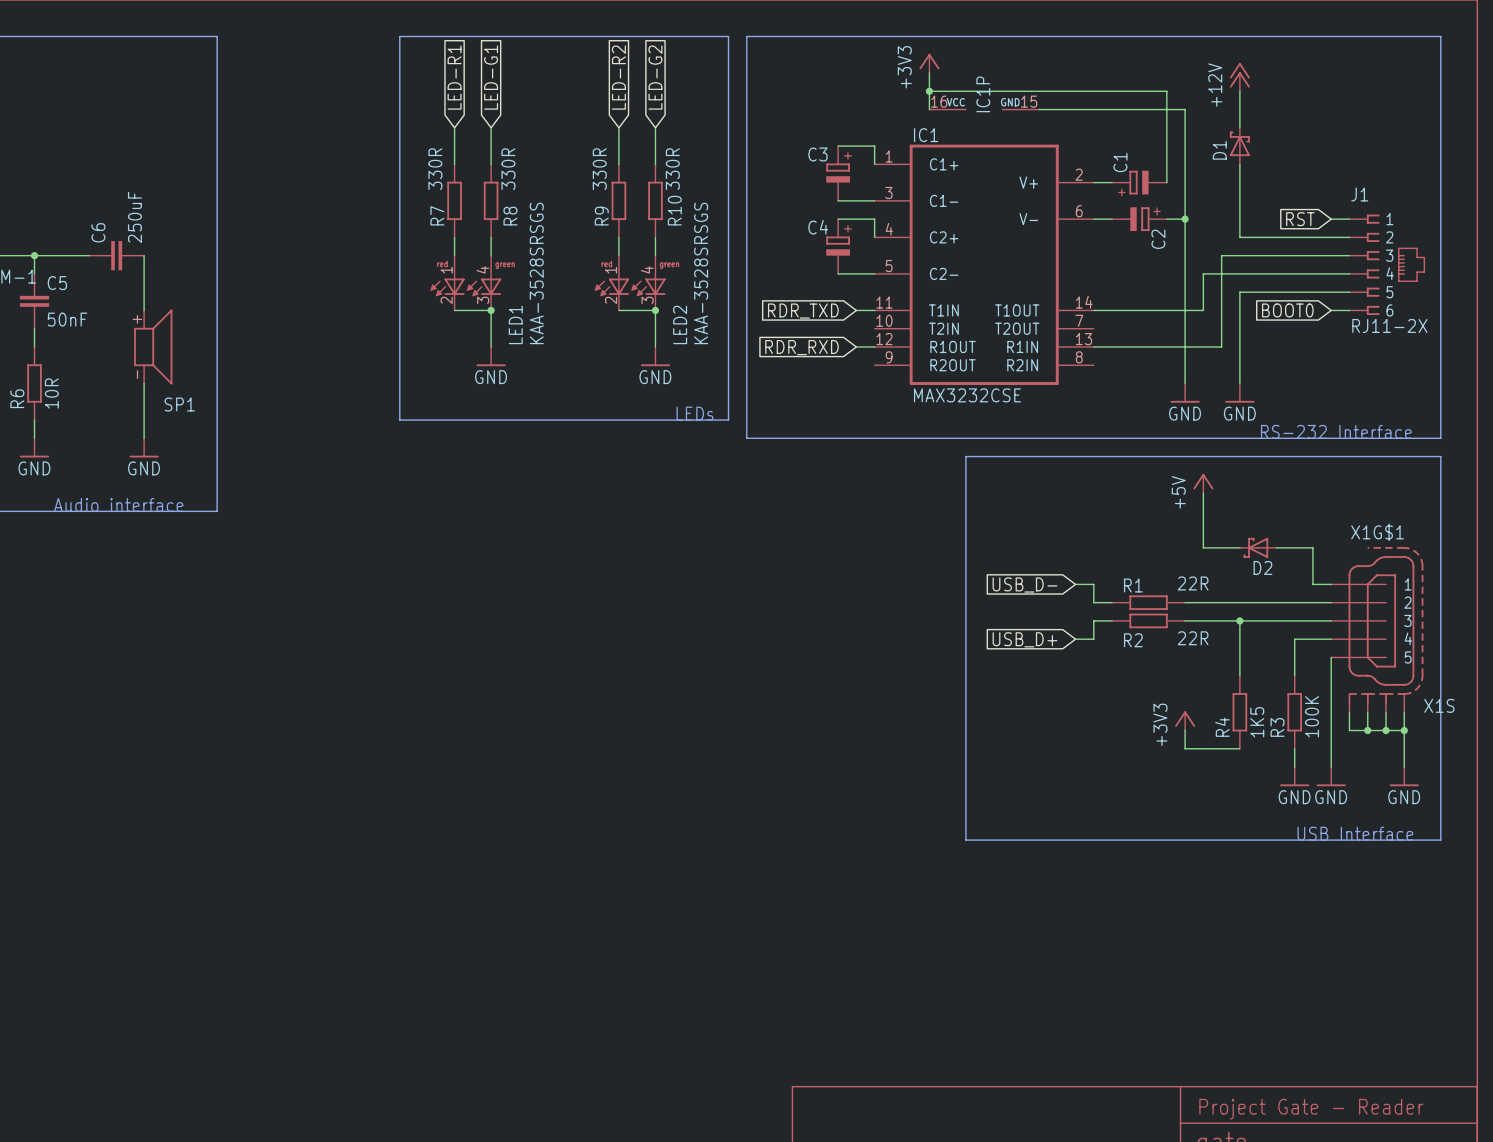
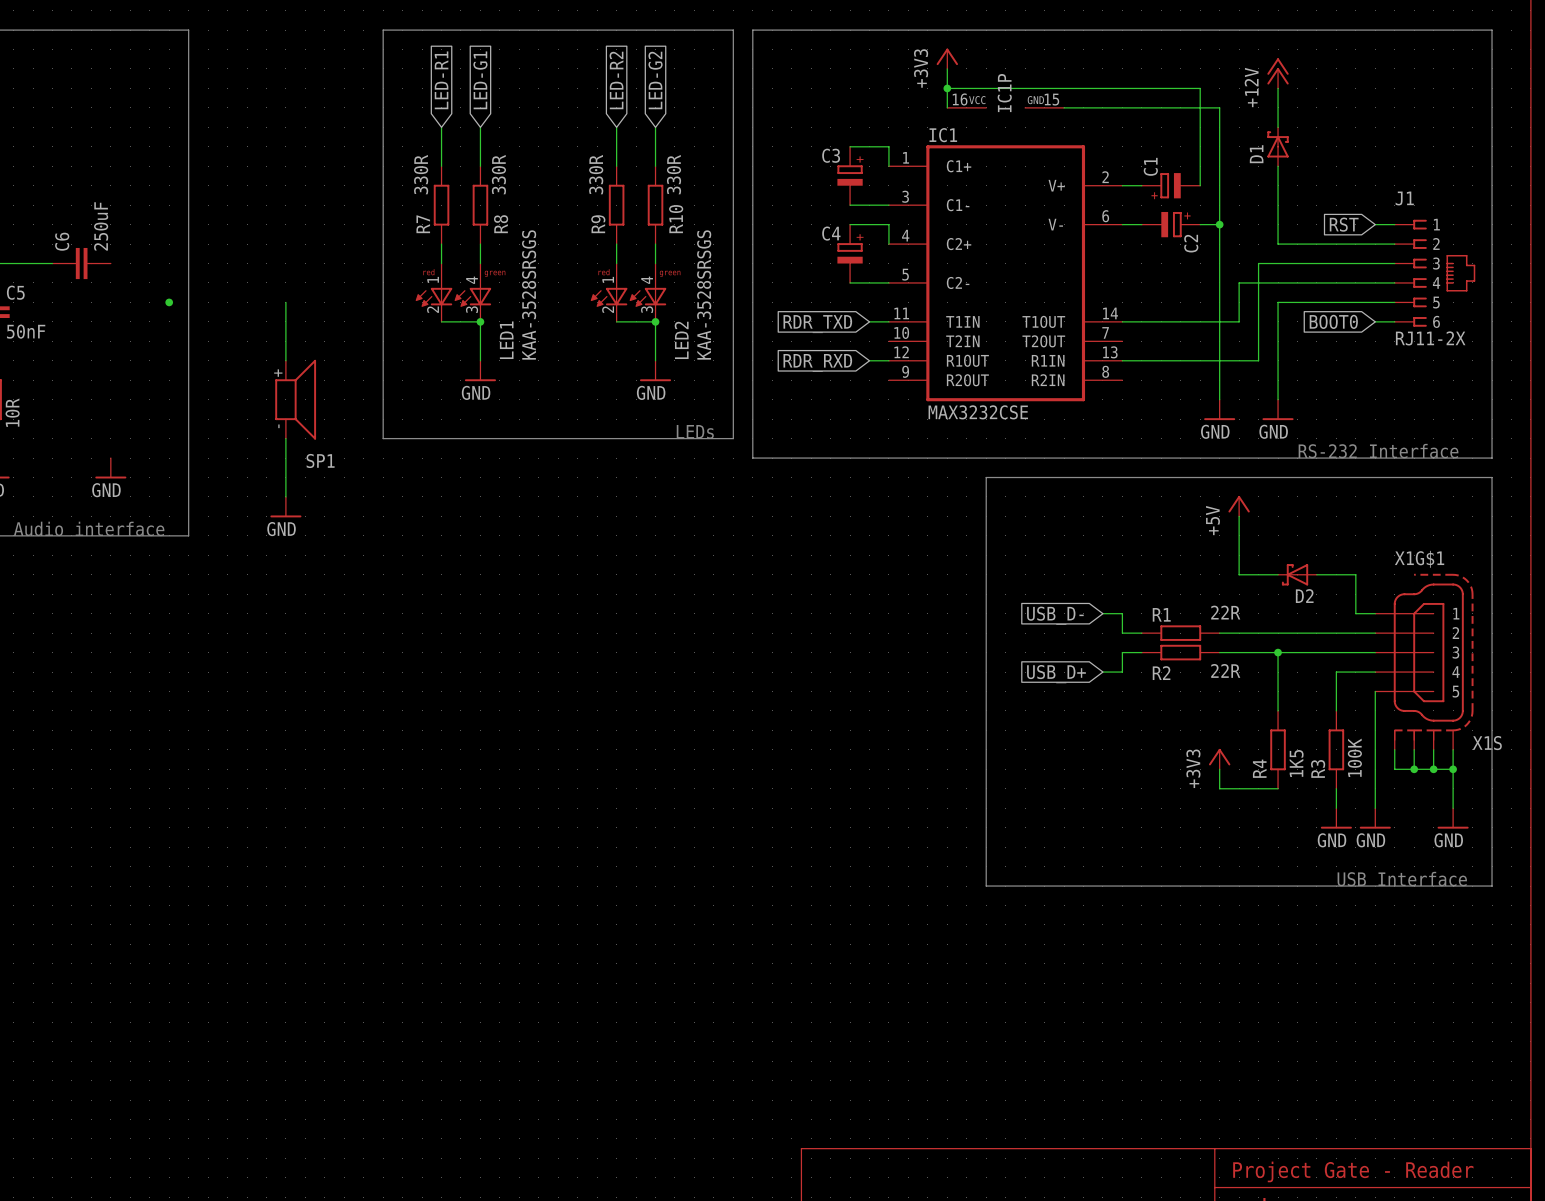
wire: (144, 255) (144, 310) -> (285, 302) (285, 360)
junction: none -> (169, 302)
SP1 position: (153, 346) -> (295, 399)
wire: (144, 383) (144, 438) -> (285, 438) (285, 496)
power symbol: none -> GND (285, 507)

